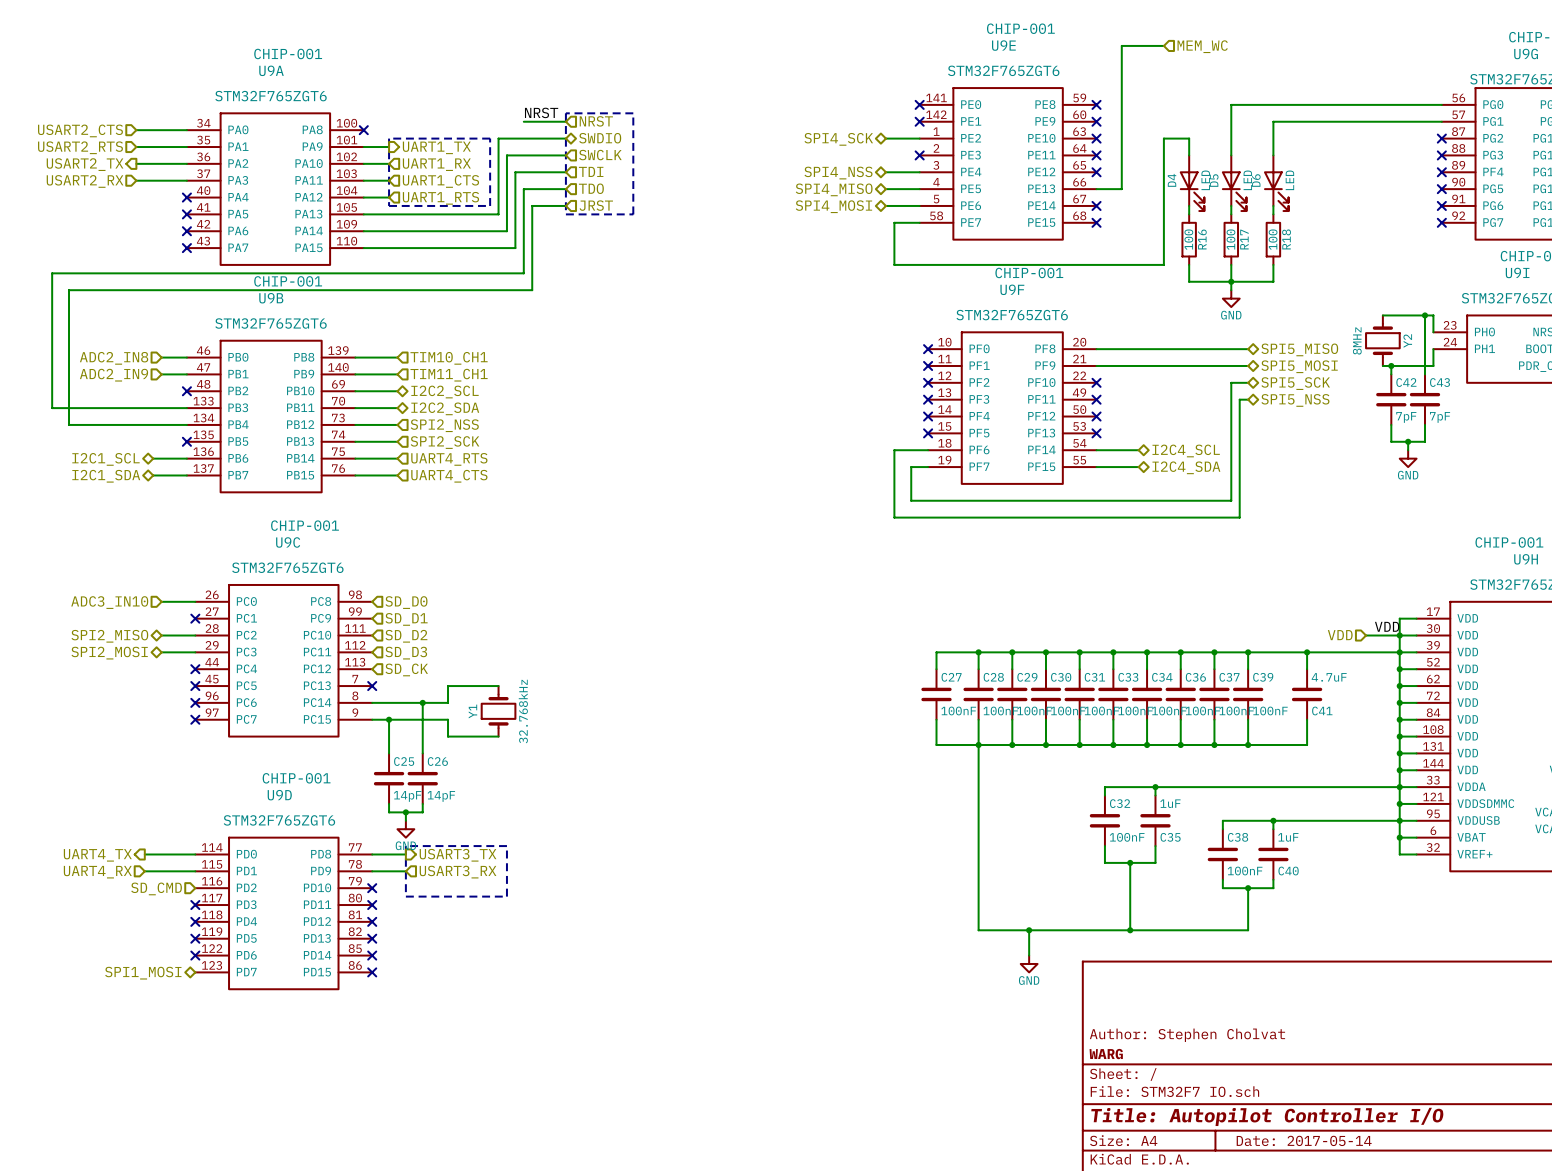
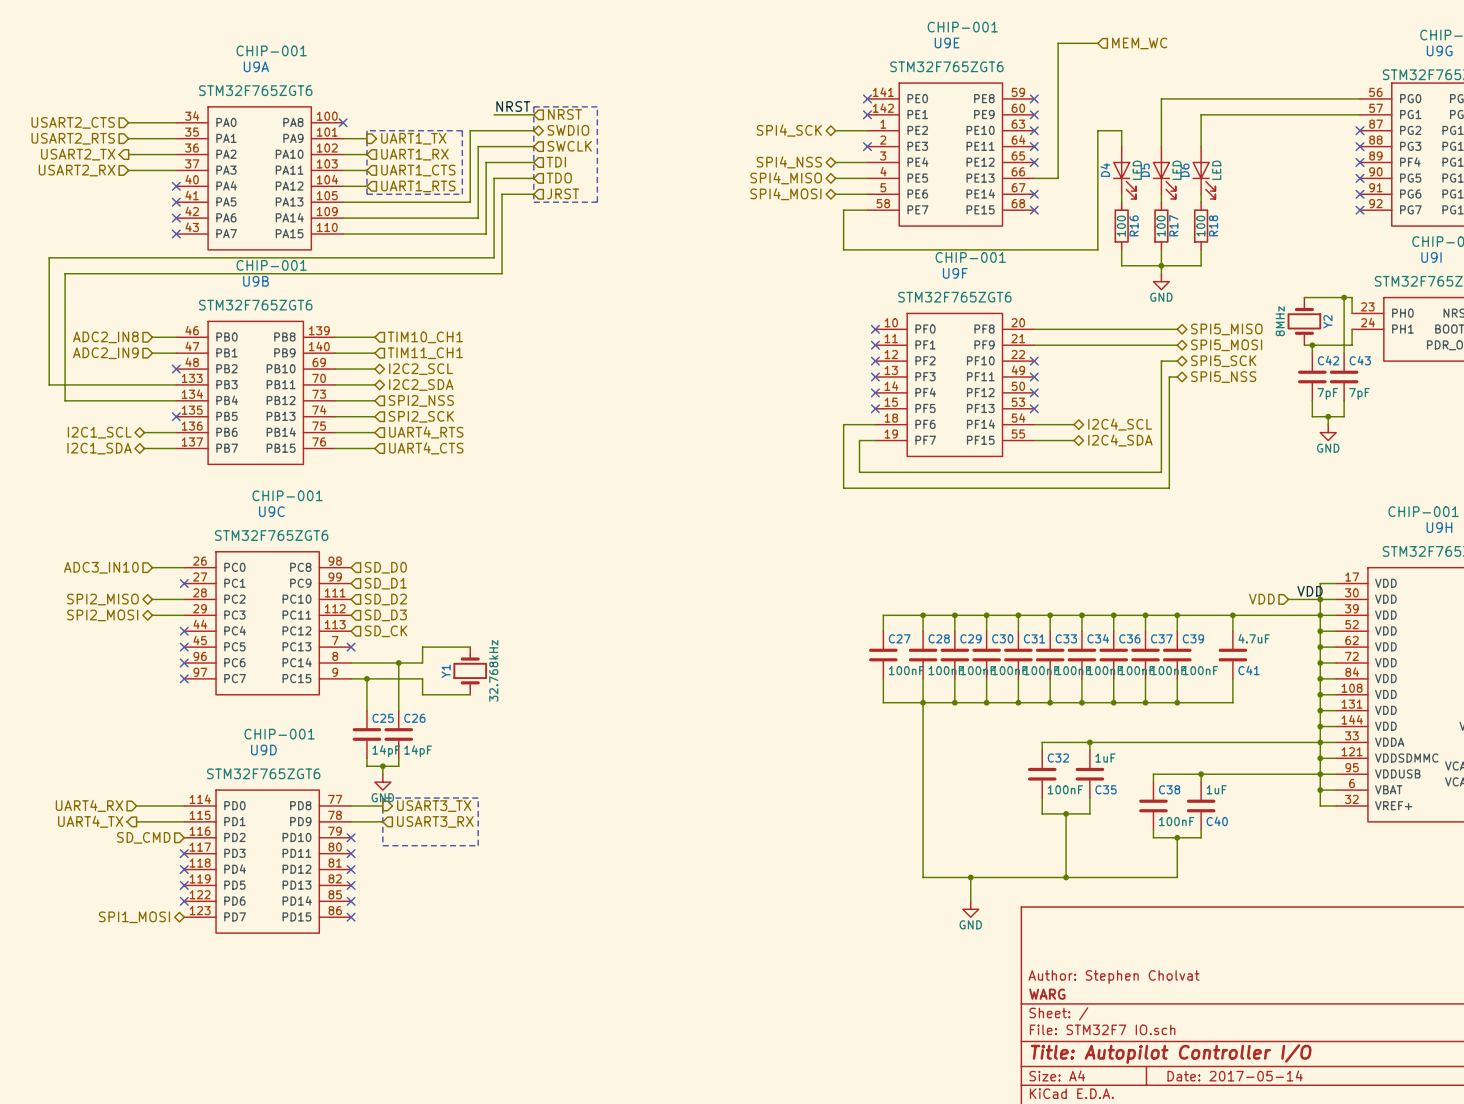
hierarchical label shape: output (97, 855) -> input (89, 805)
hierarchical label: UART4_TX (97, 855) -> UART4_RX (89, 805)
hierarchical label shape: input (97, 872) -> output (90, 821)
hierarchical label: UART4_RX (97, 872) -> UART4_TX (90, 821)

